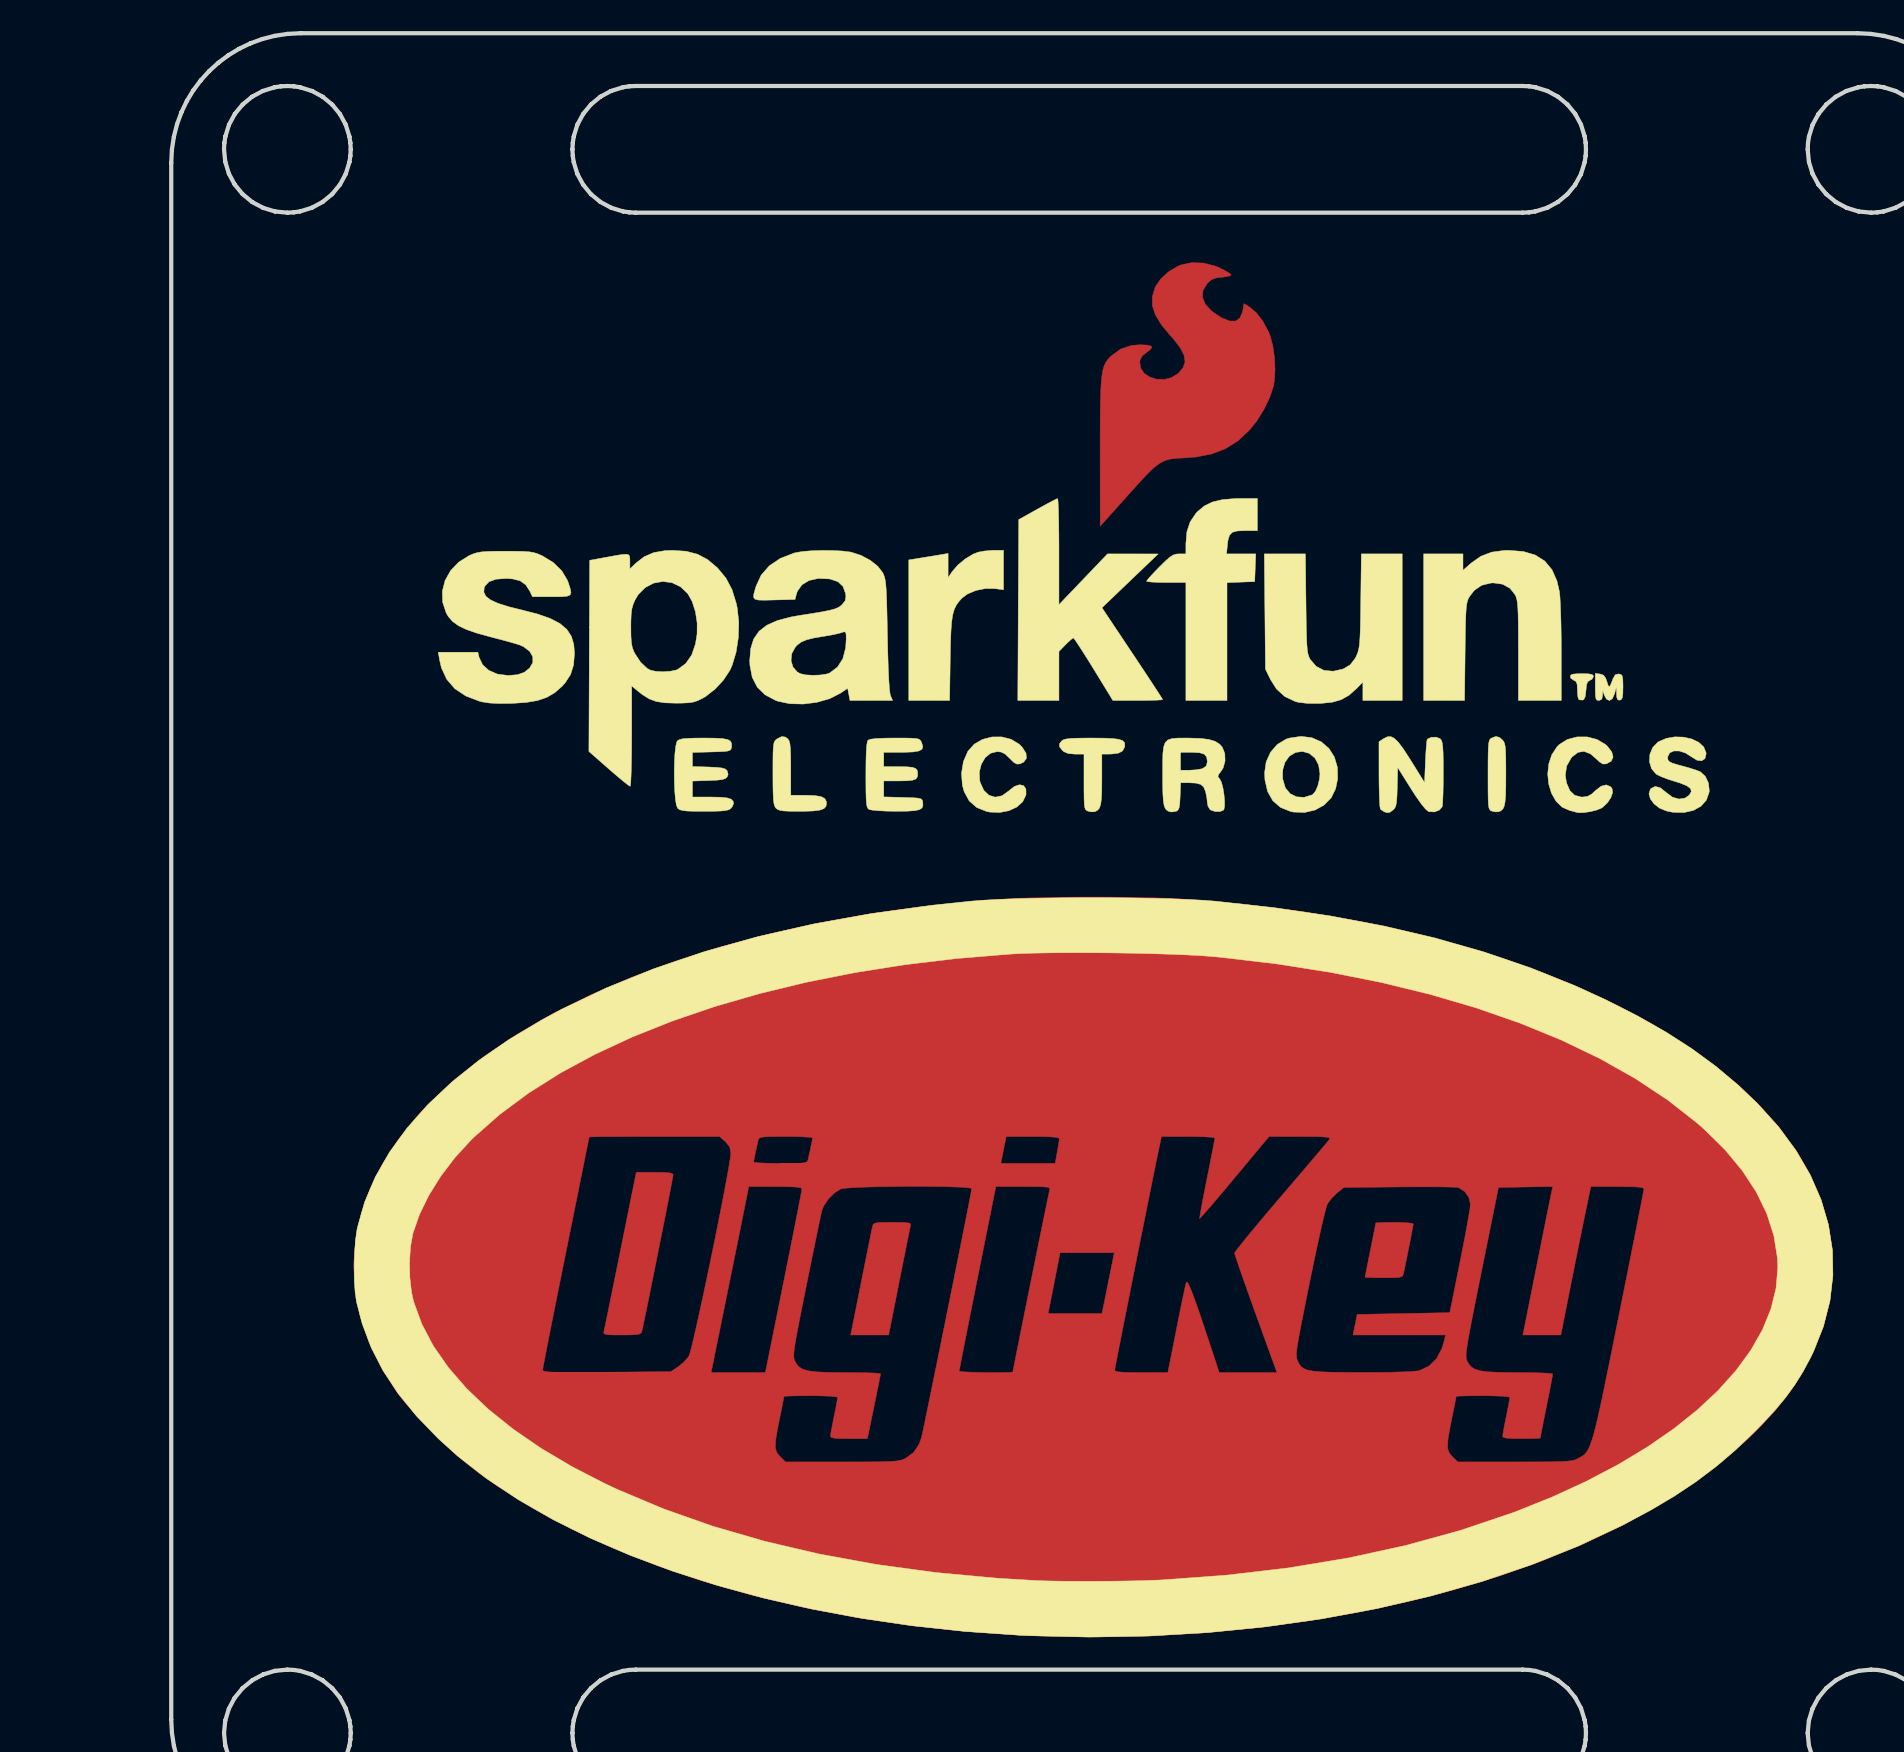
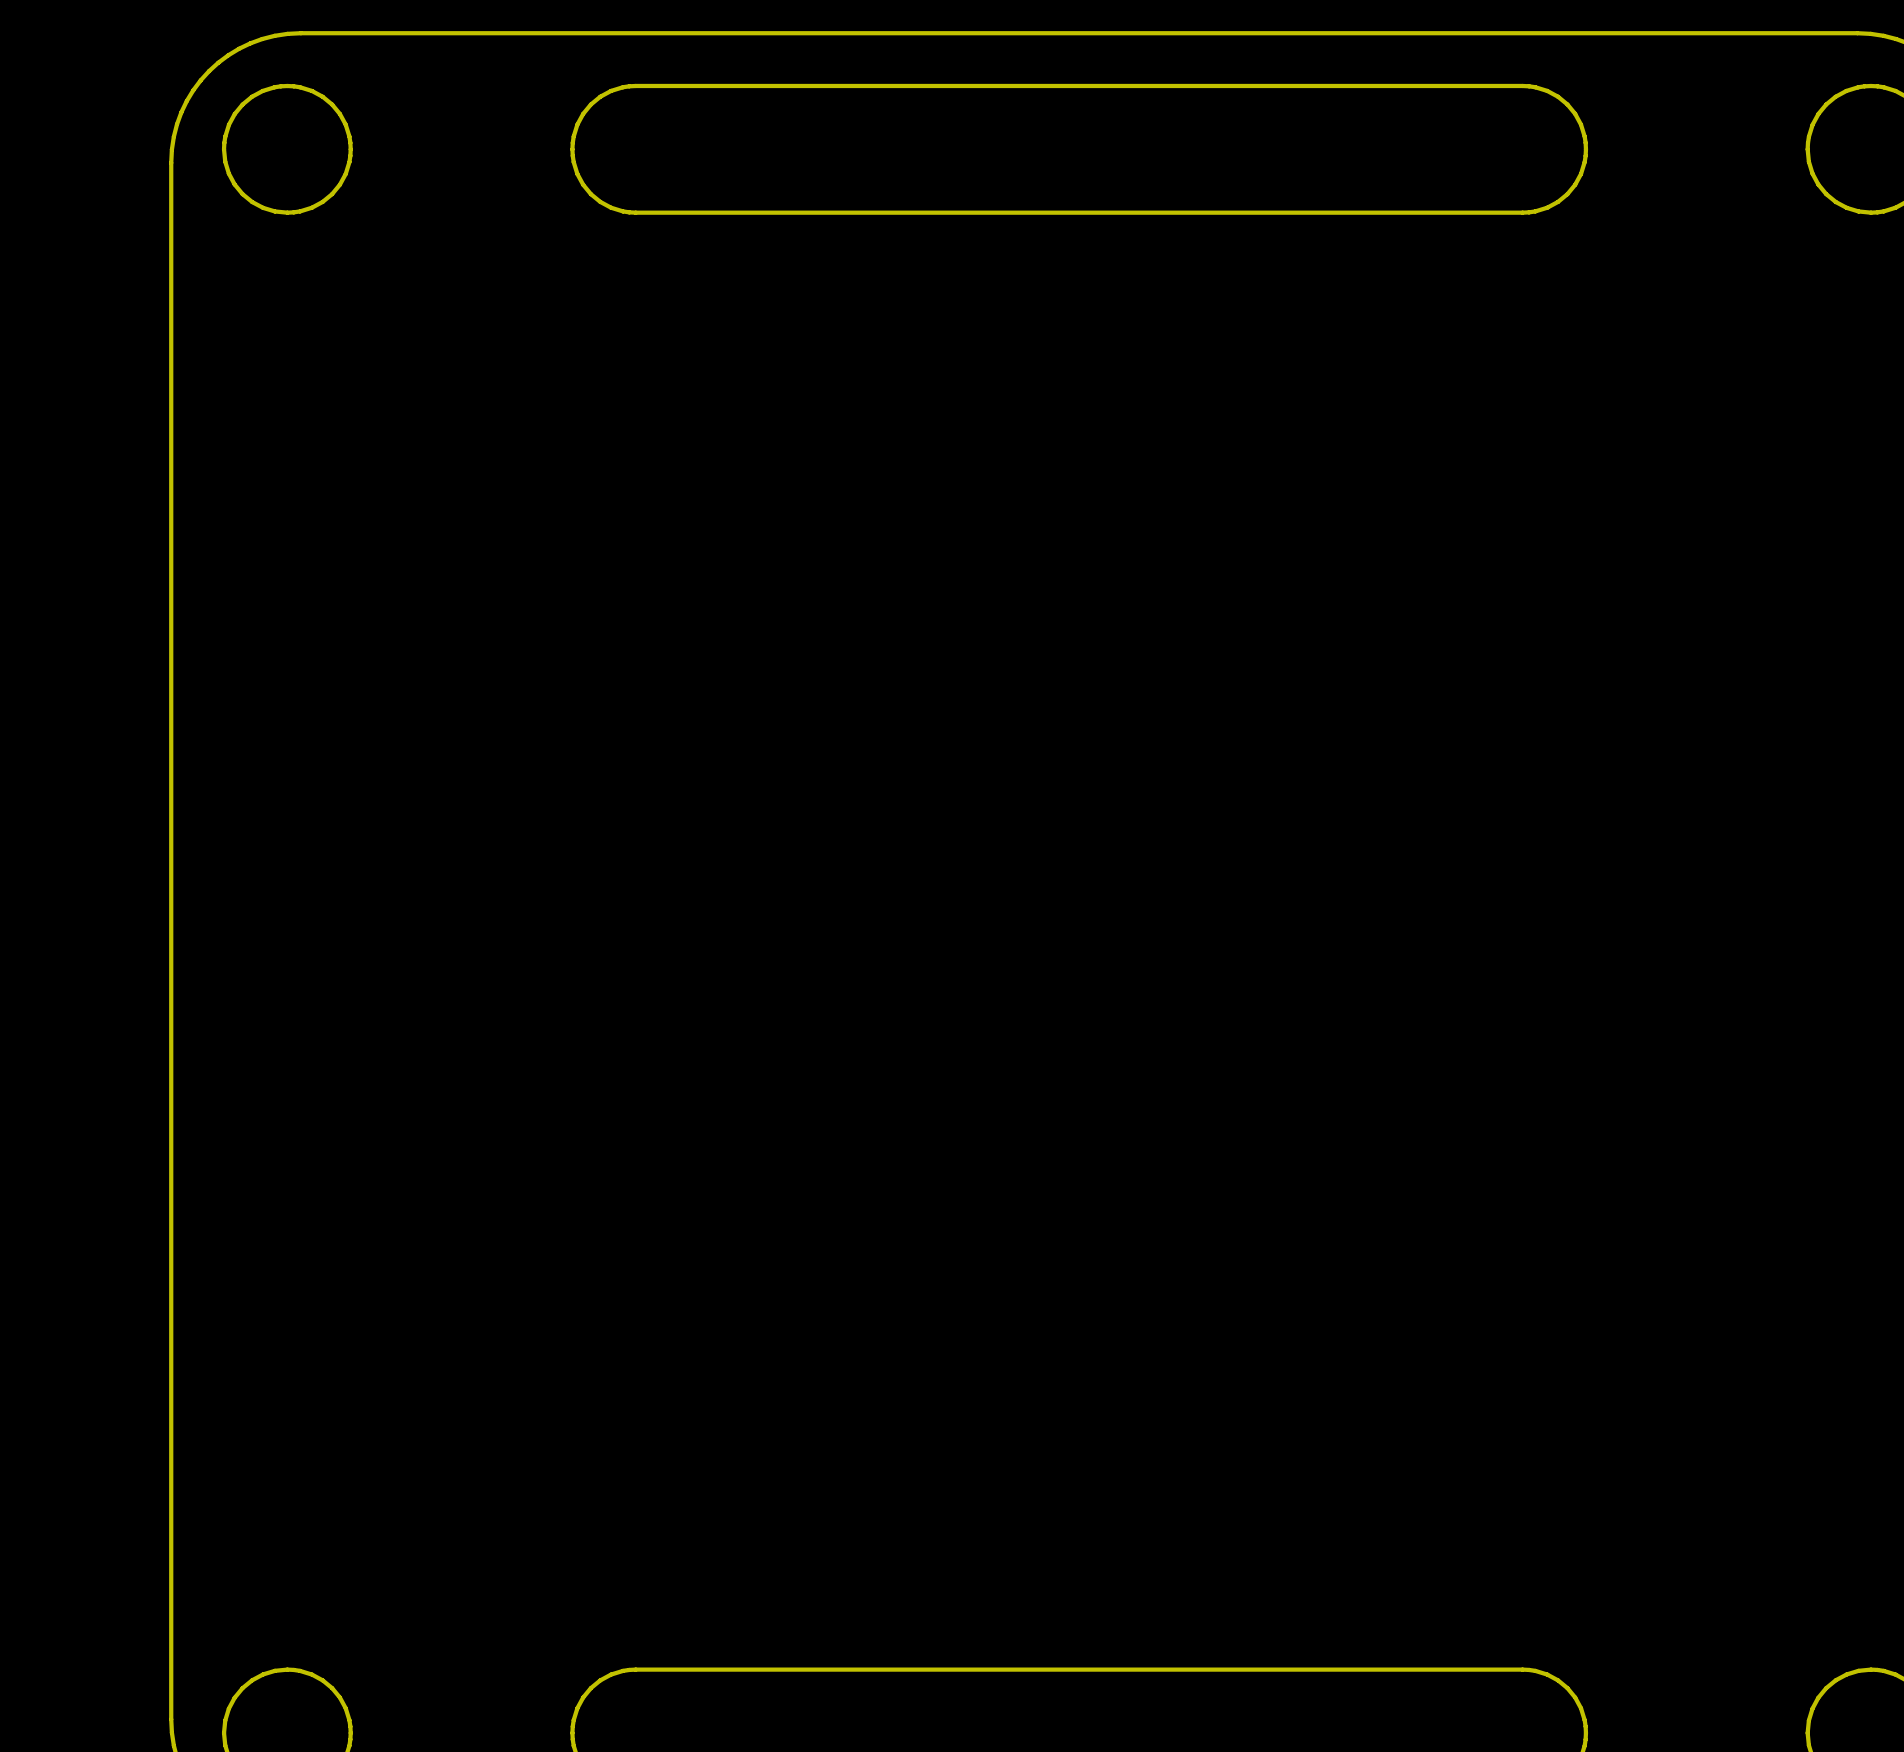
drawing: [438, 262, 1710, 813] -> none
drawing: [353, 896, 1834, 1638] -> none

